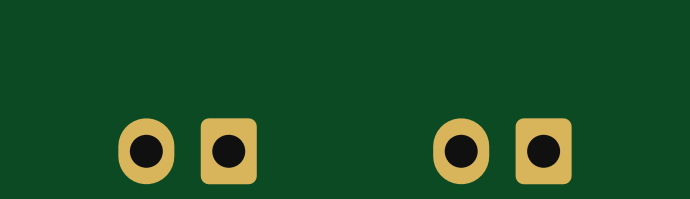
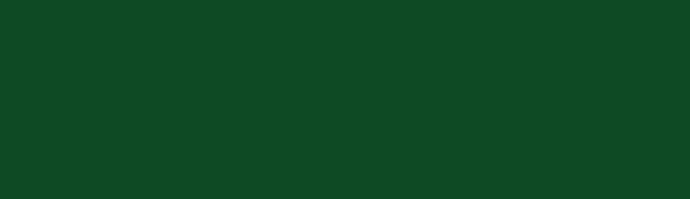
part: (187, 151) -> none
part: (502, 151) -> none

